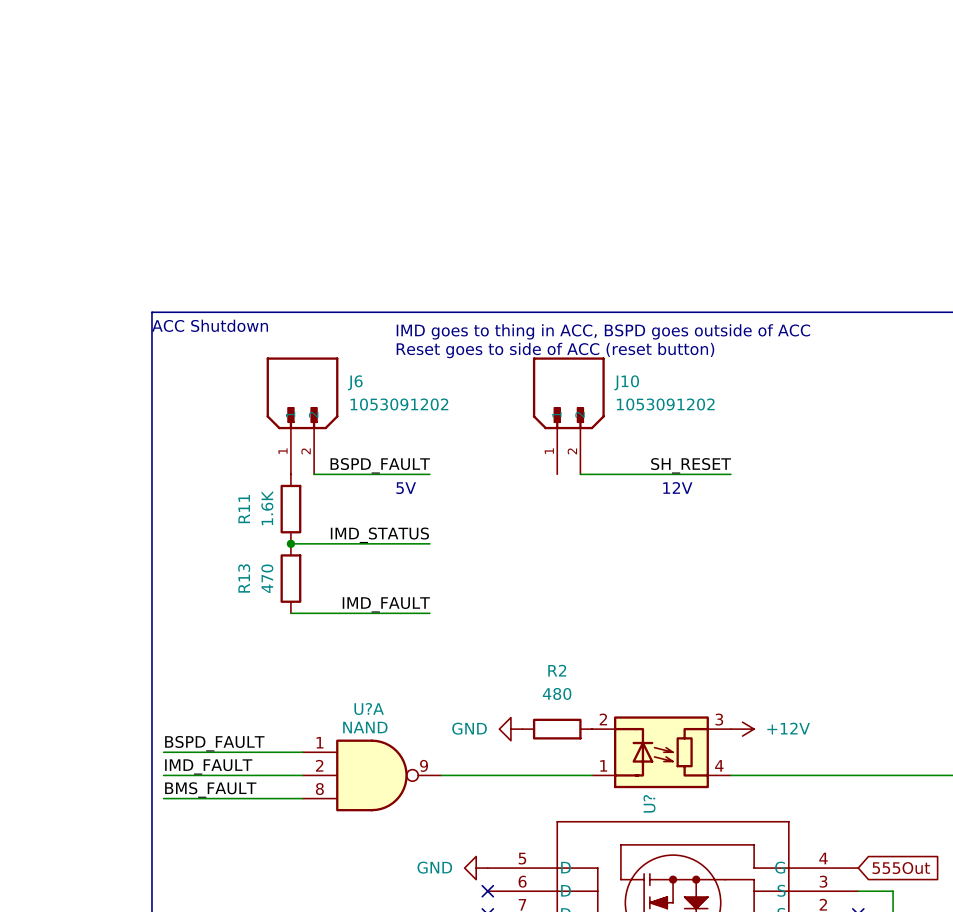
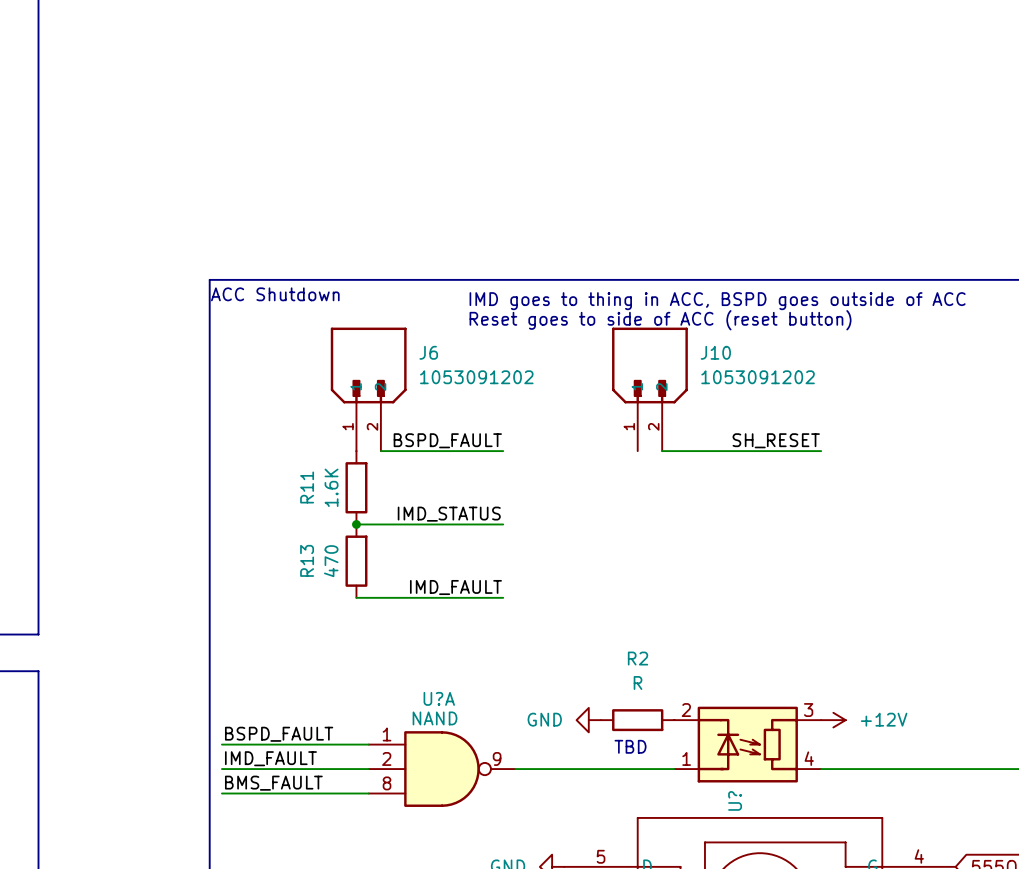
text: 12V (677, 487) -> none
text: 5V (406, 488) -> none
R2 value: 480 (557, 693) -> R (638, 682)
text: none -> TBD (630, 746)

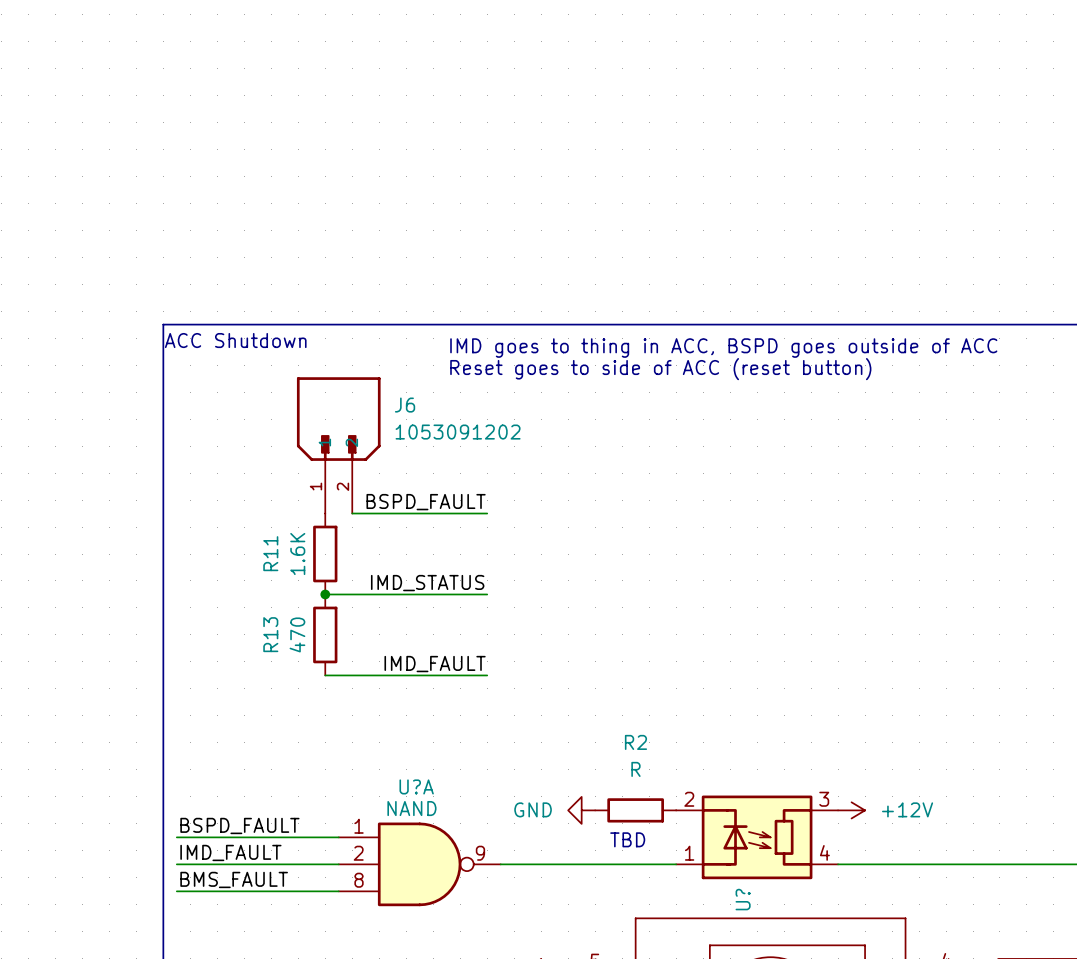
J10: 1053091202 (649, 389) -> none
label: SH_RESET (776, 440) -> none
wire: (662, 451) (821, 451) -> none

